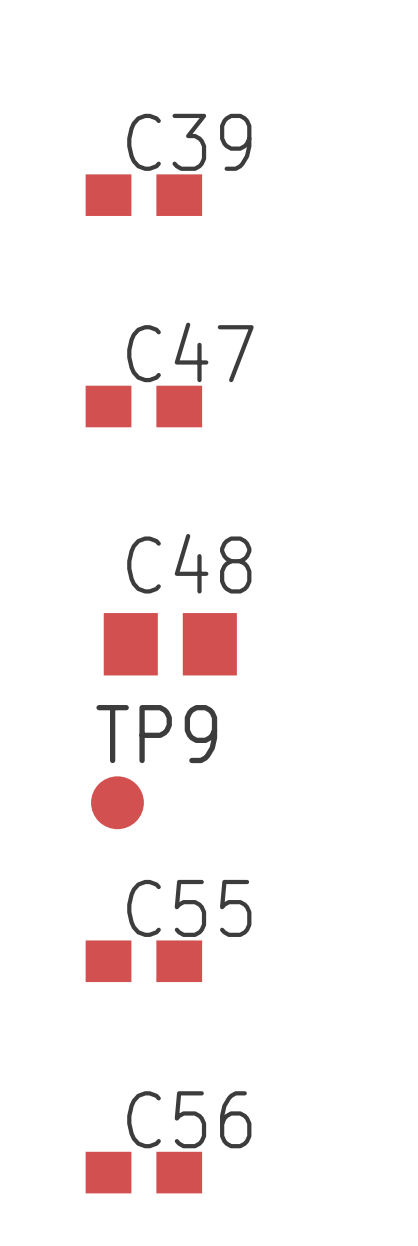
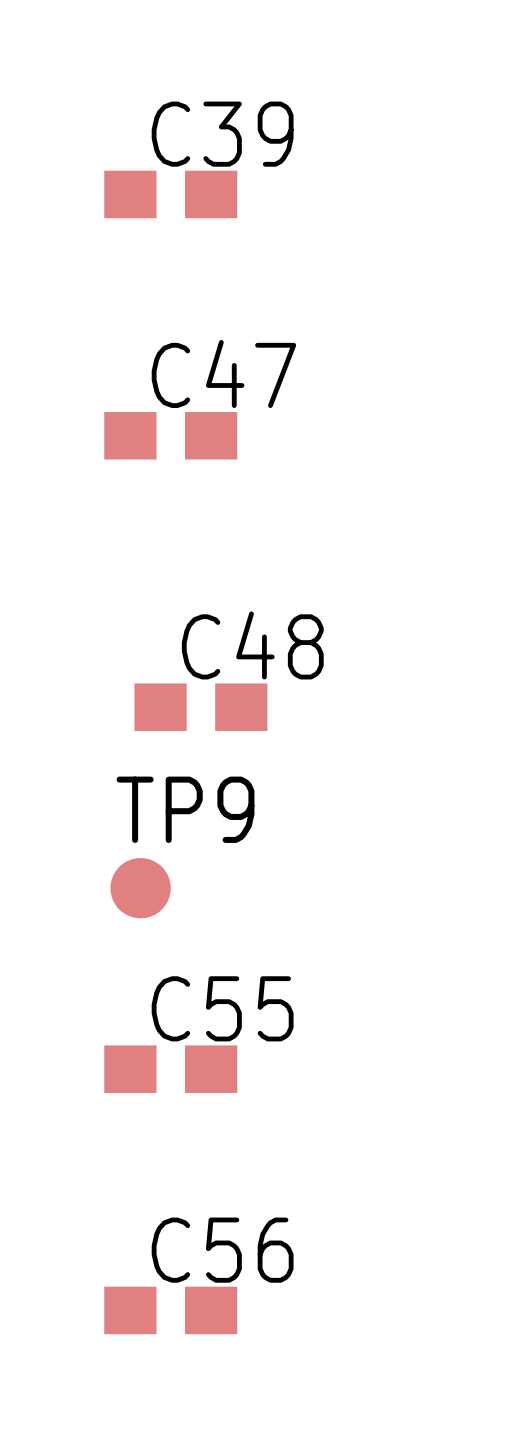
C48 name position: C48 (189, 563) -> C48 (252, 645)
C48 footprint: [103, 613, 237, 676] -> [134, 683, 268, 731]

